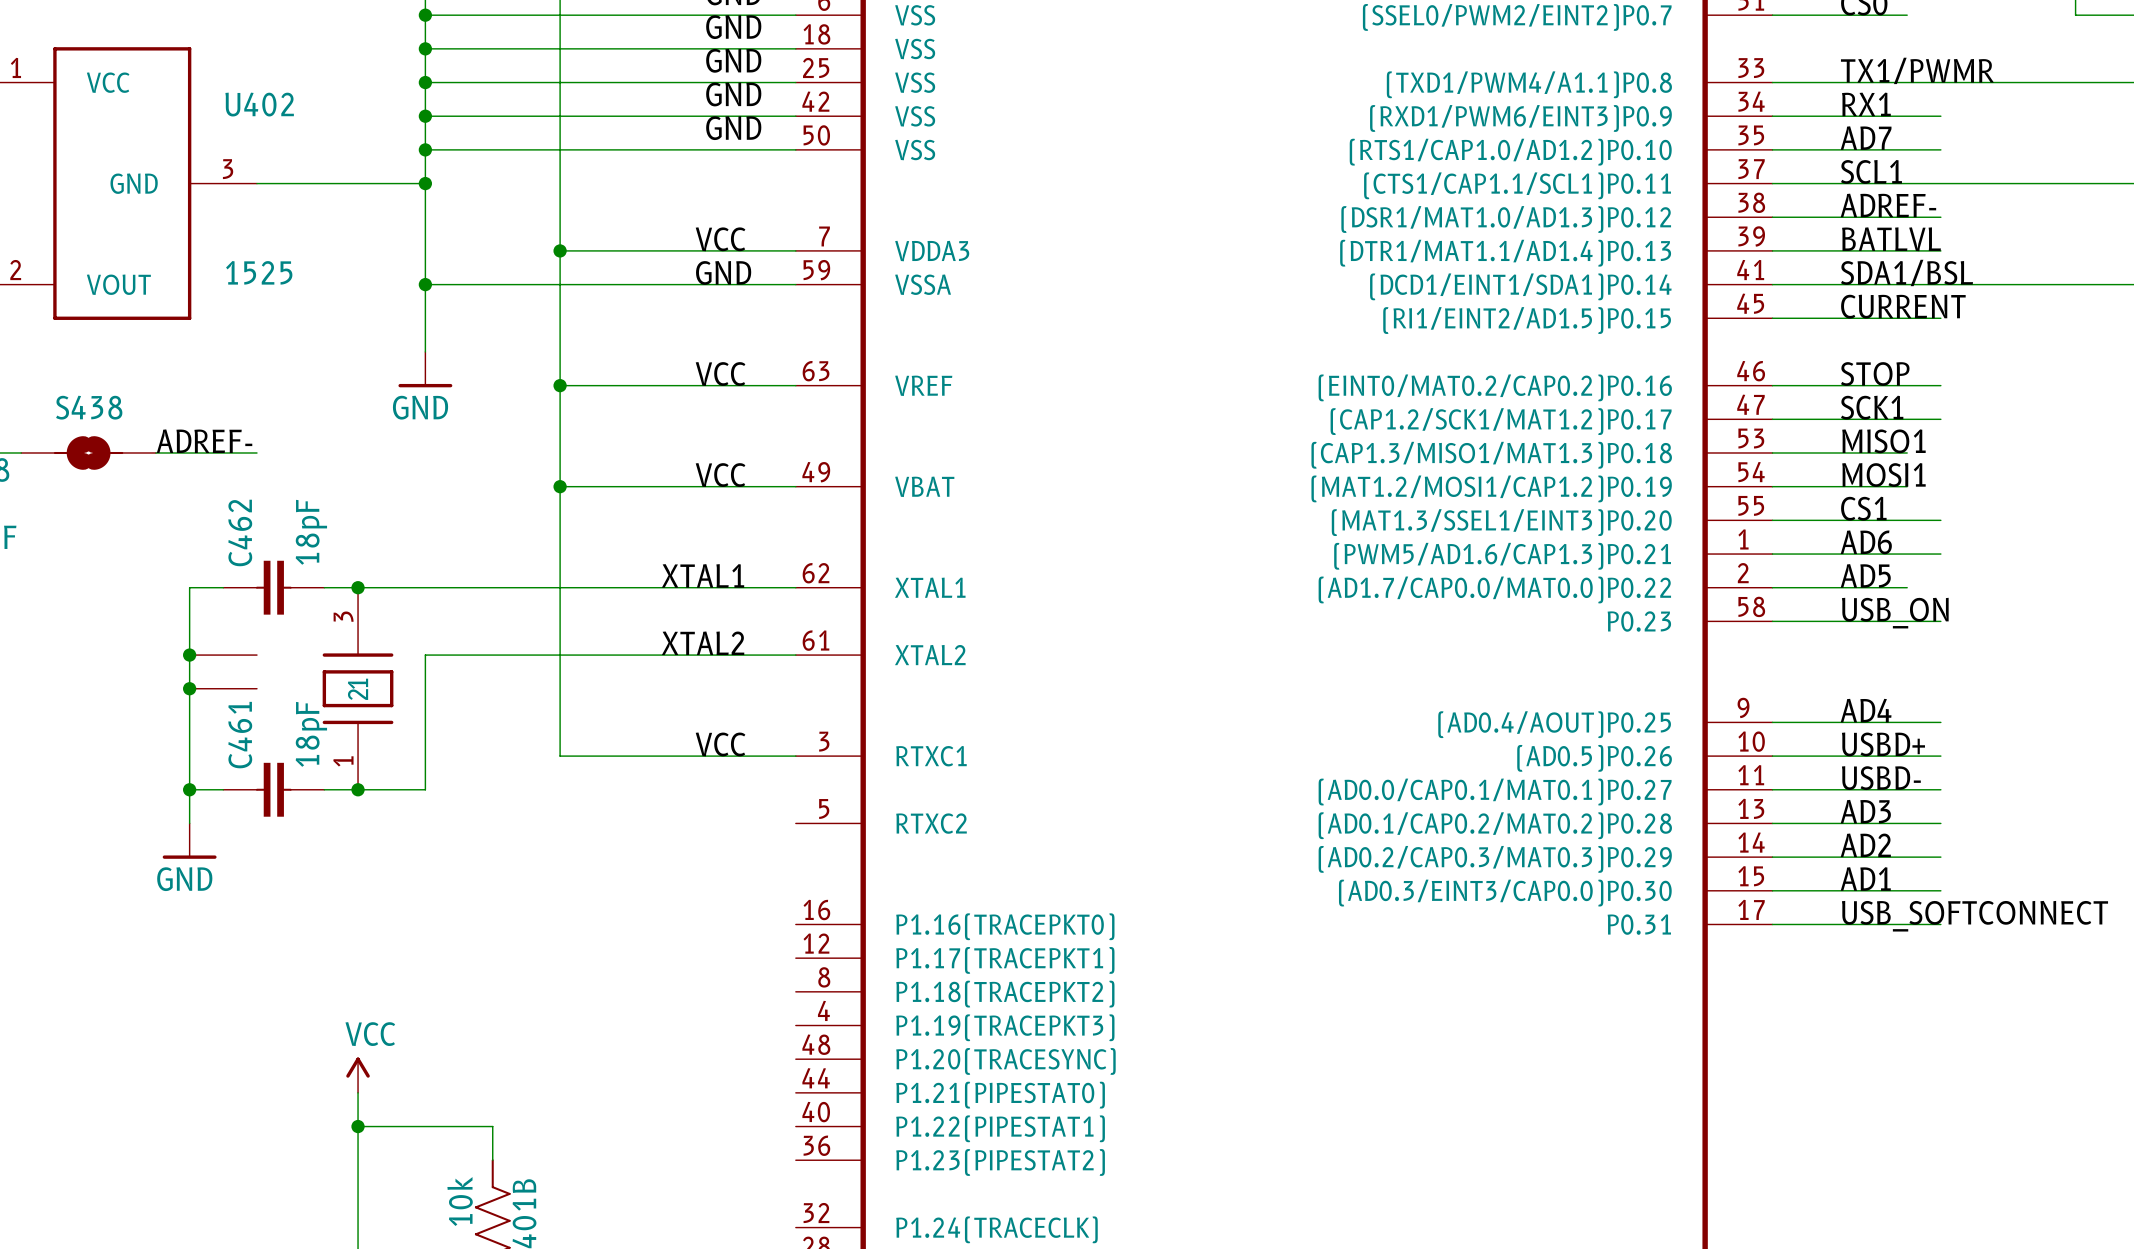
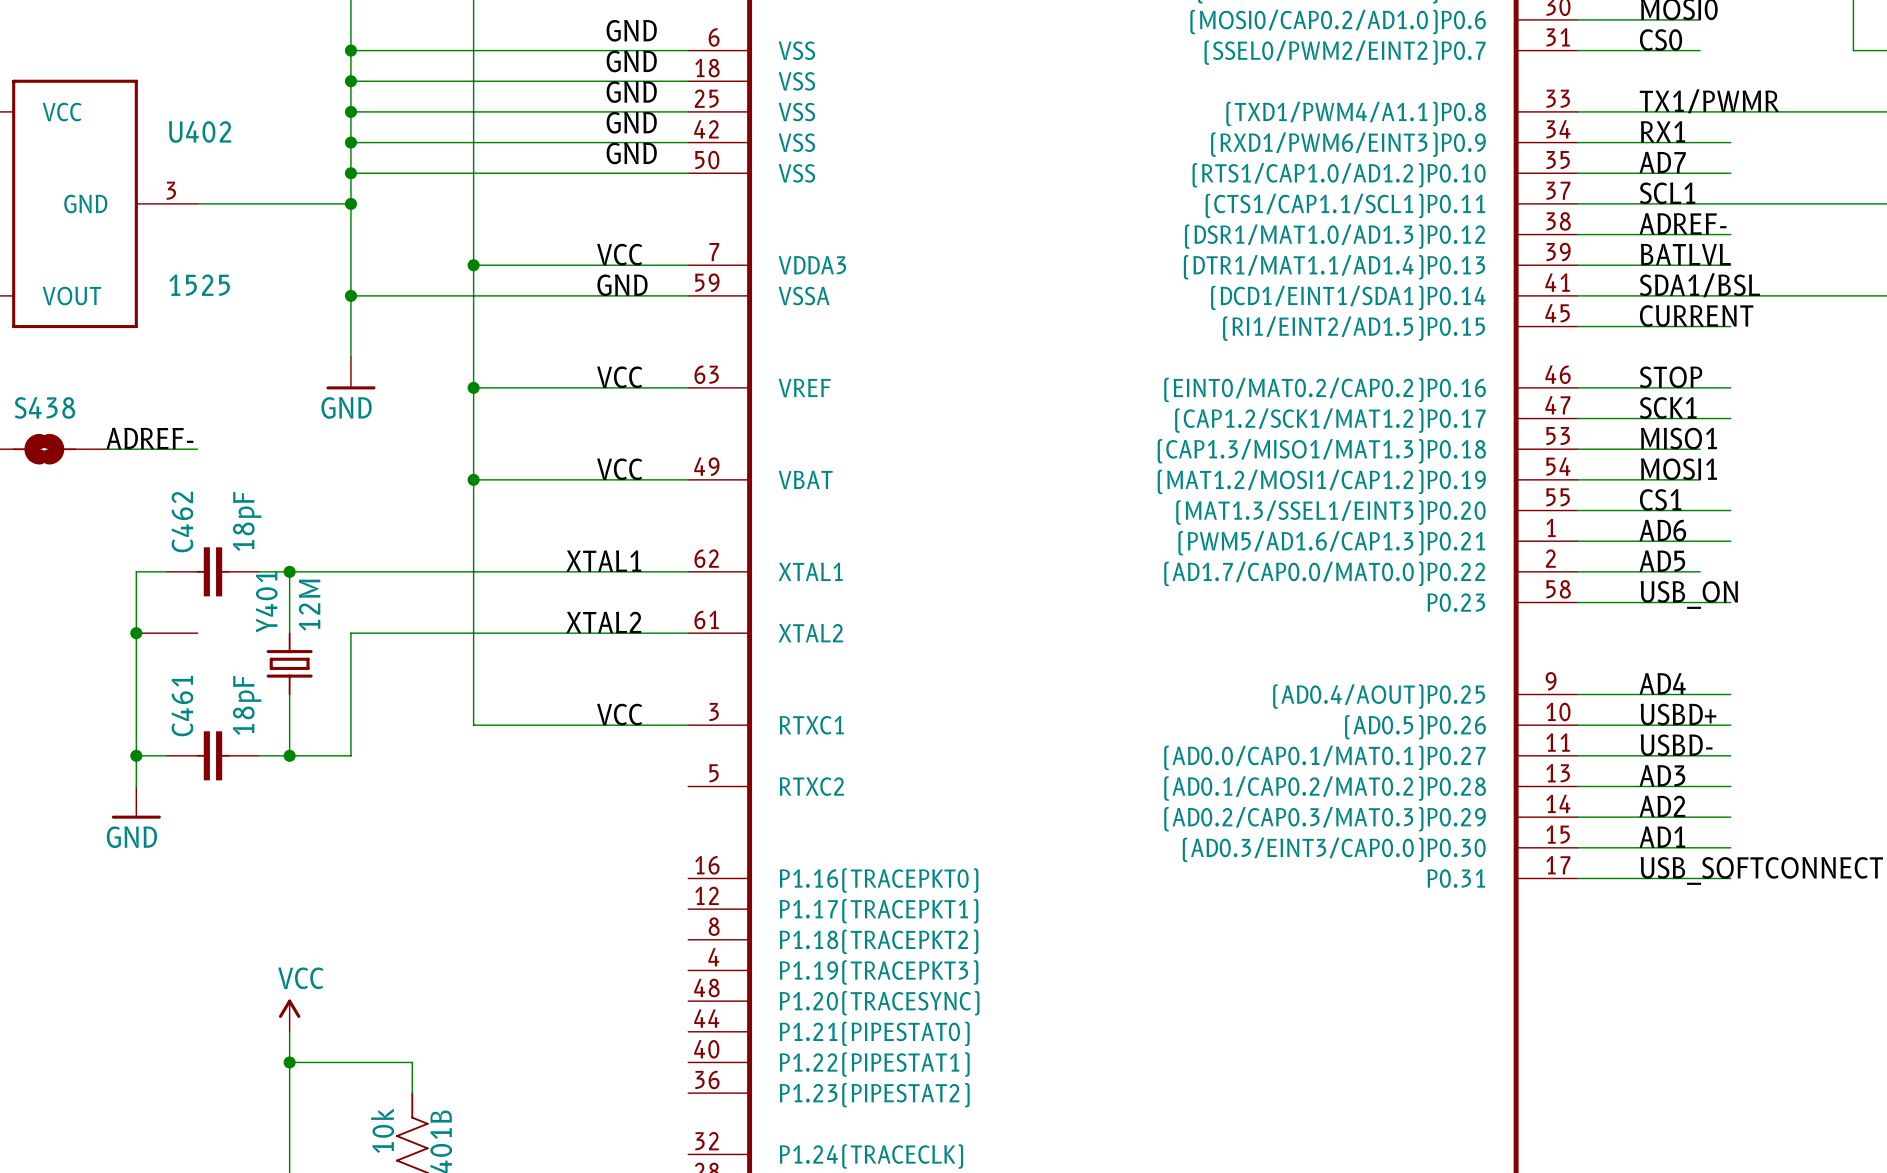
junction: (189, 688) -> none
part: (223, 688) -> none
part: (358, 688) -> none
Y401: none -> 12M (289, 663)

